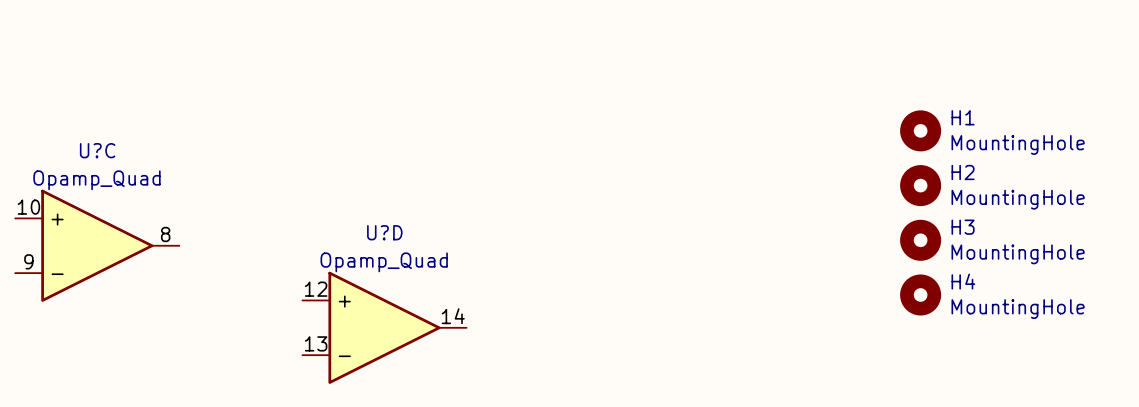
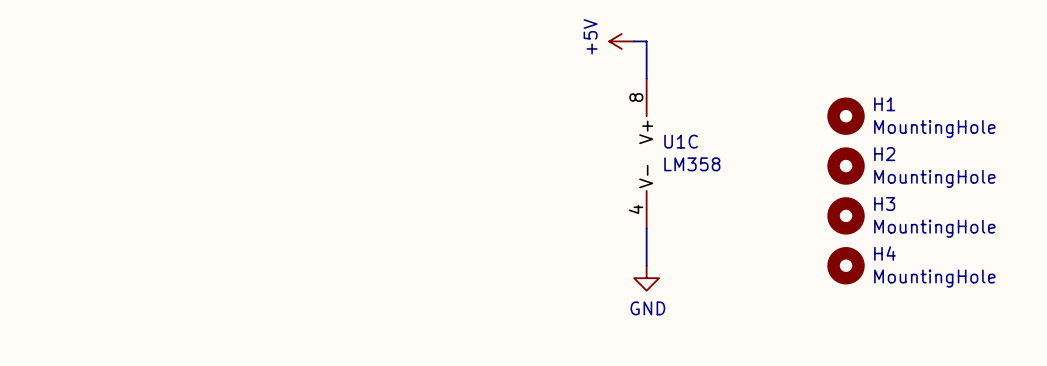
power symbol: none -> +5V (621, 41)
wire: none -> (634, 41) (646, 41) (646, 78)
U1C: none -> LM358 (646, 153)
U?C: Opamp_Quad (97, 245) -> none
wire: none -> (646, 228) (646, 265)
power symbol: none -> GND (646, 278)
U?D: Opamp_Quad (384, 327) -> none

